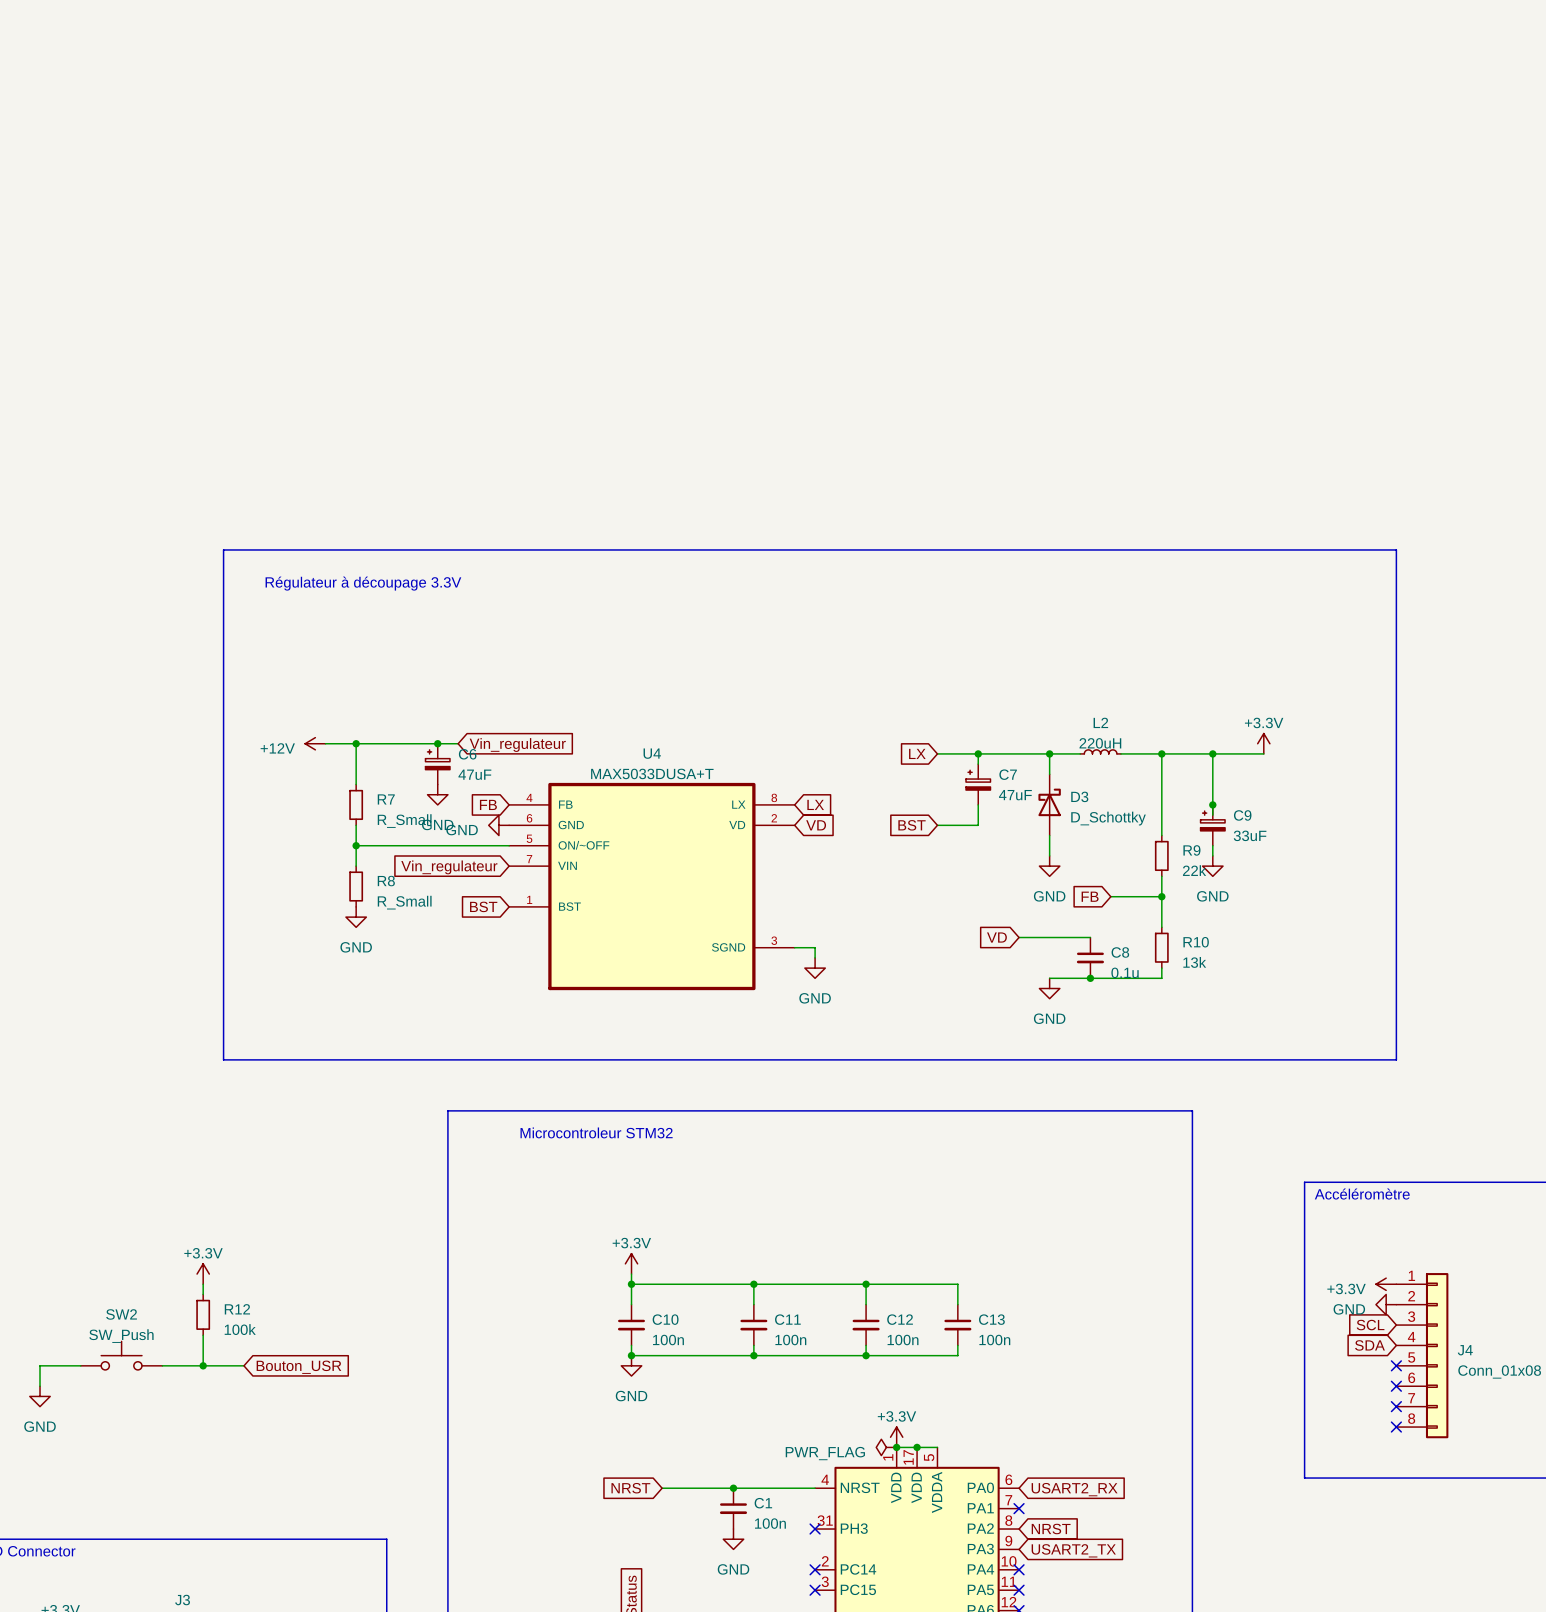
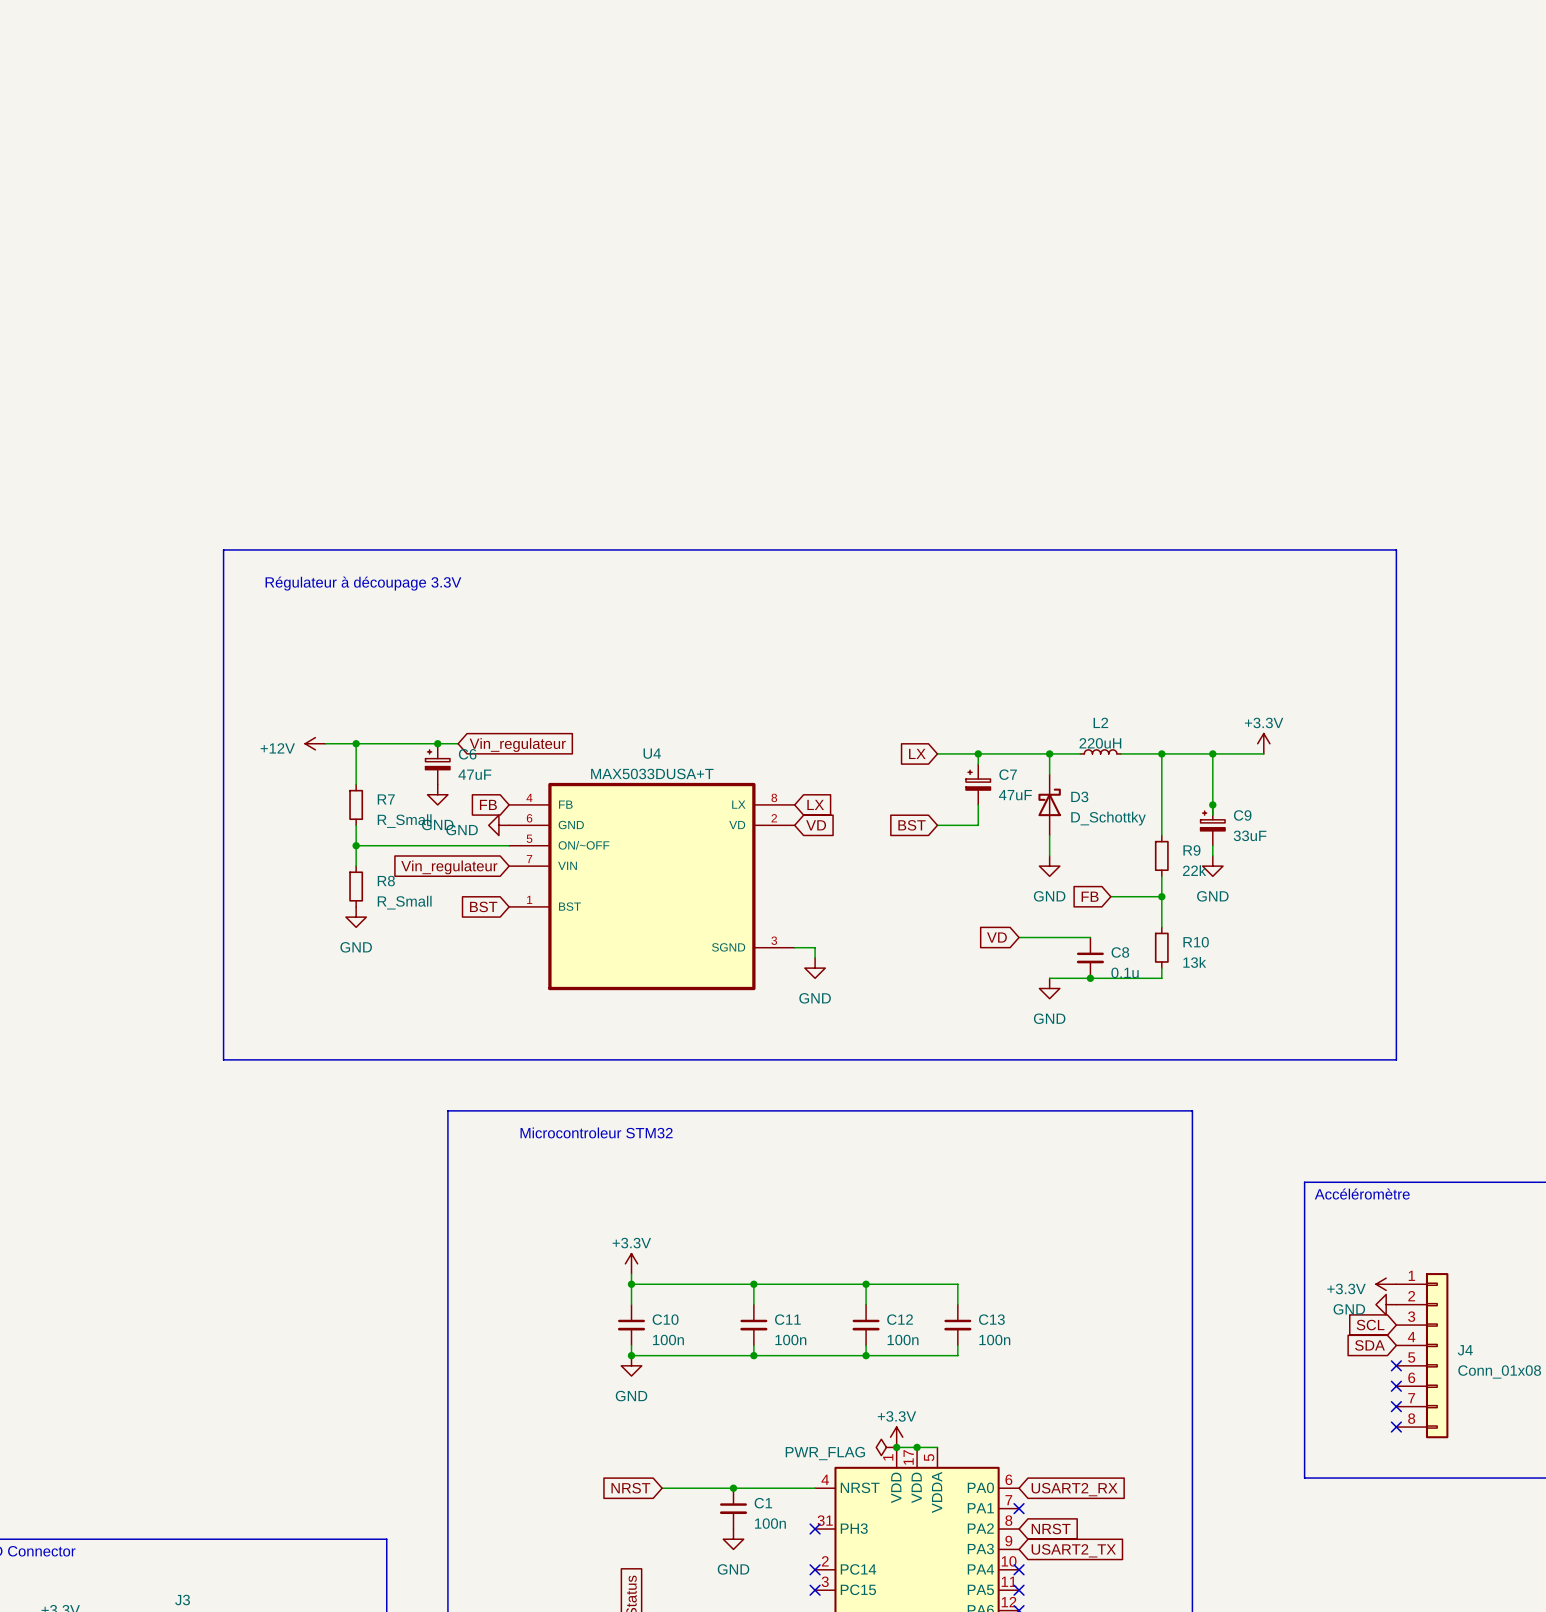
power symbol: +3.3V (203, 1274) -> none
wire: (203, 1284) (203, 1294) -> none
R12: 100k (203, 1314) -> none
wire: (203, 1335) (203, 1365) -> none
SW2: SW_Push (121, 1355) -> none
wire: (80, 1365) (40, 1365) (40, 1386) -> none
wire: (162, 1365) (243, 1365) -> none
junction: (203, 1365) -> none
global label: Bouton_USR (298, 1367) -> none
power symbol: GND (40, 1396) -> none

